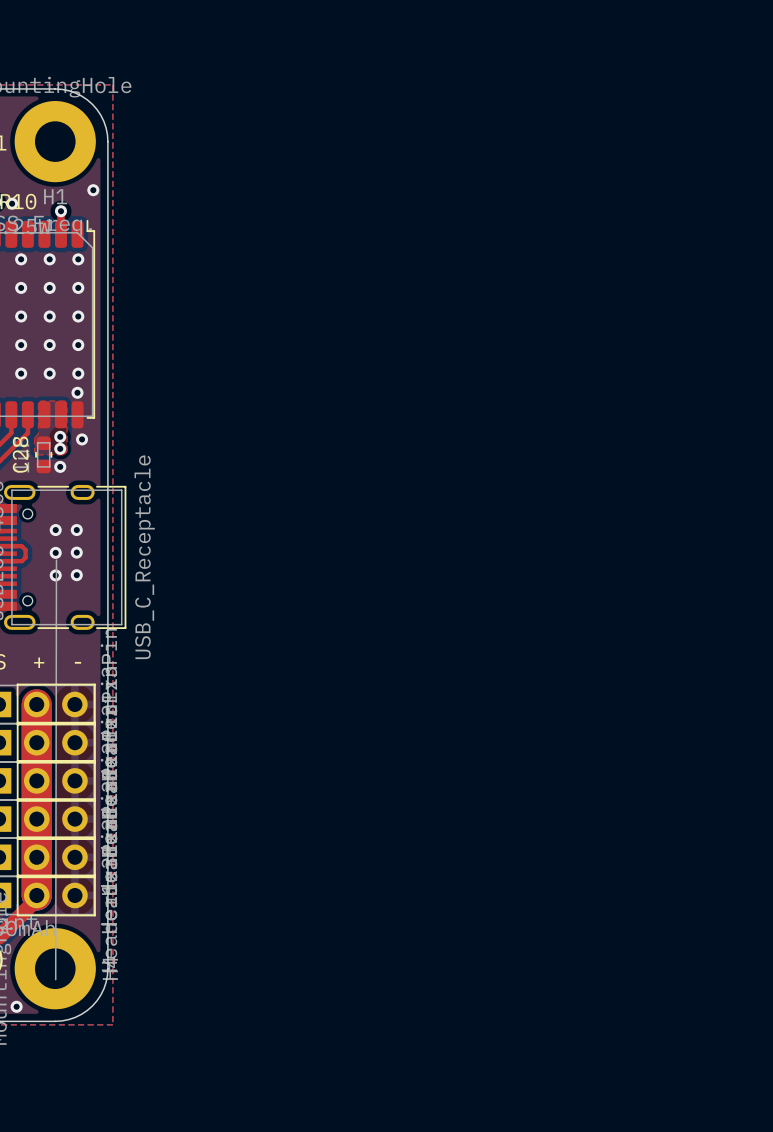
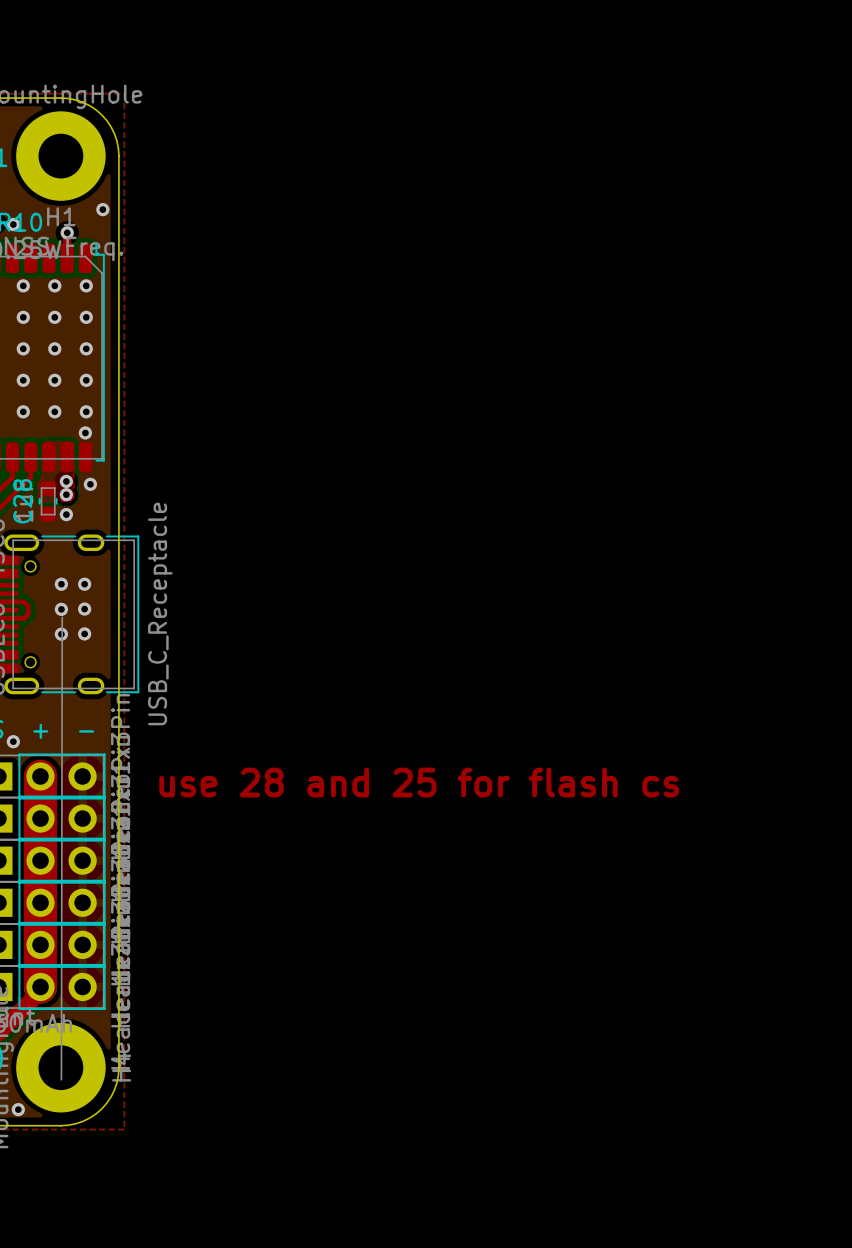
via: none -> (13, 741)
text: none -> use 28 and 25 for flash cs (419, 782)

